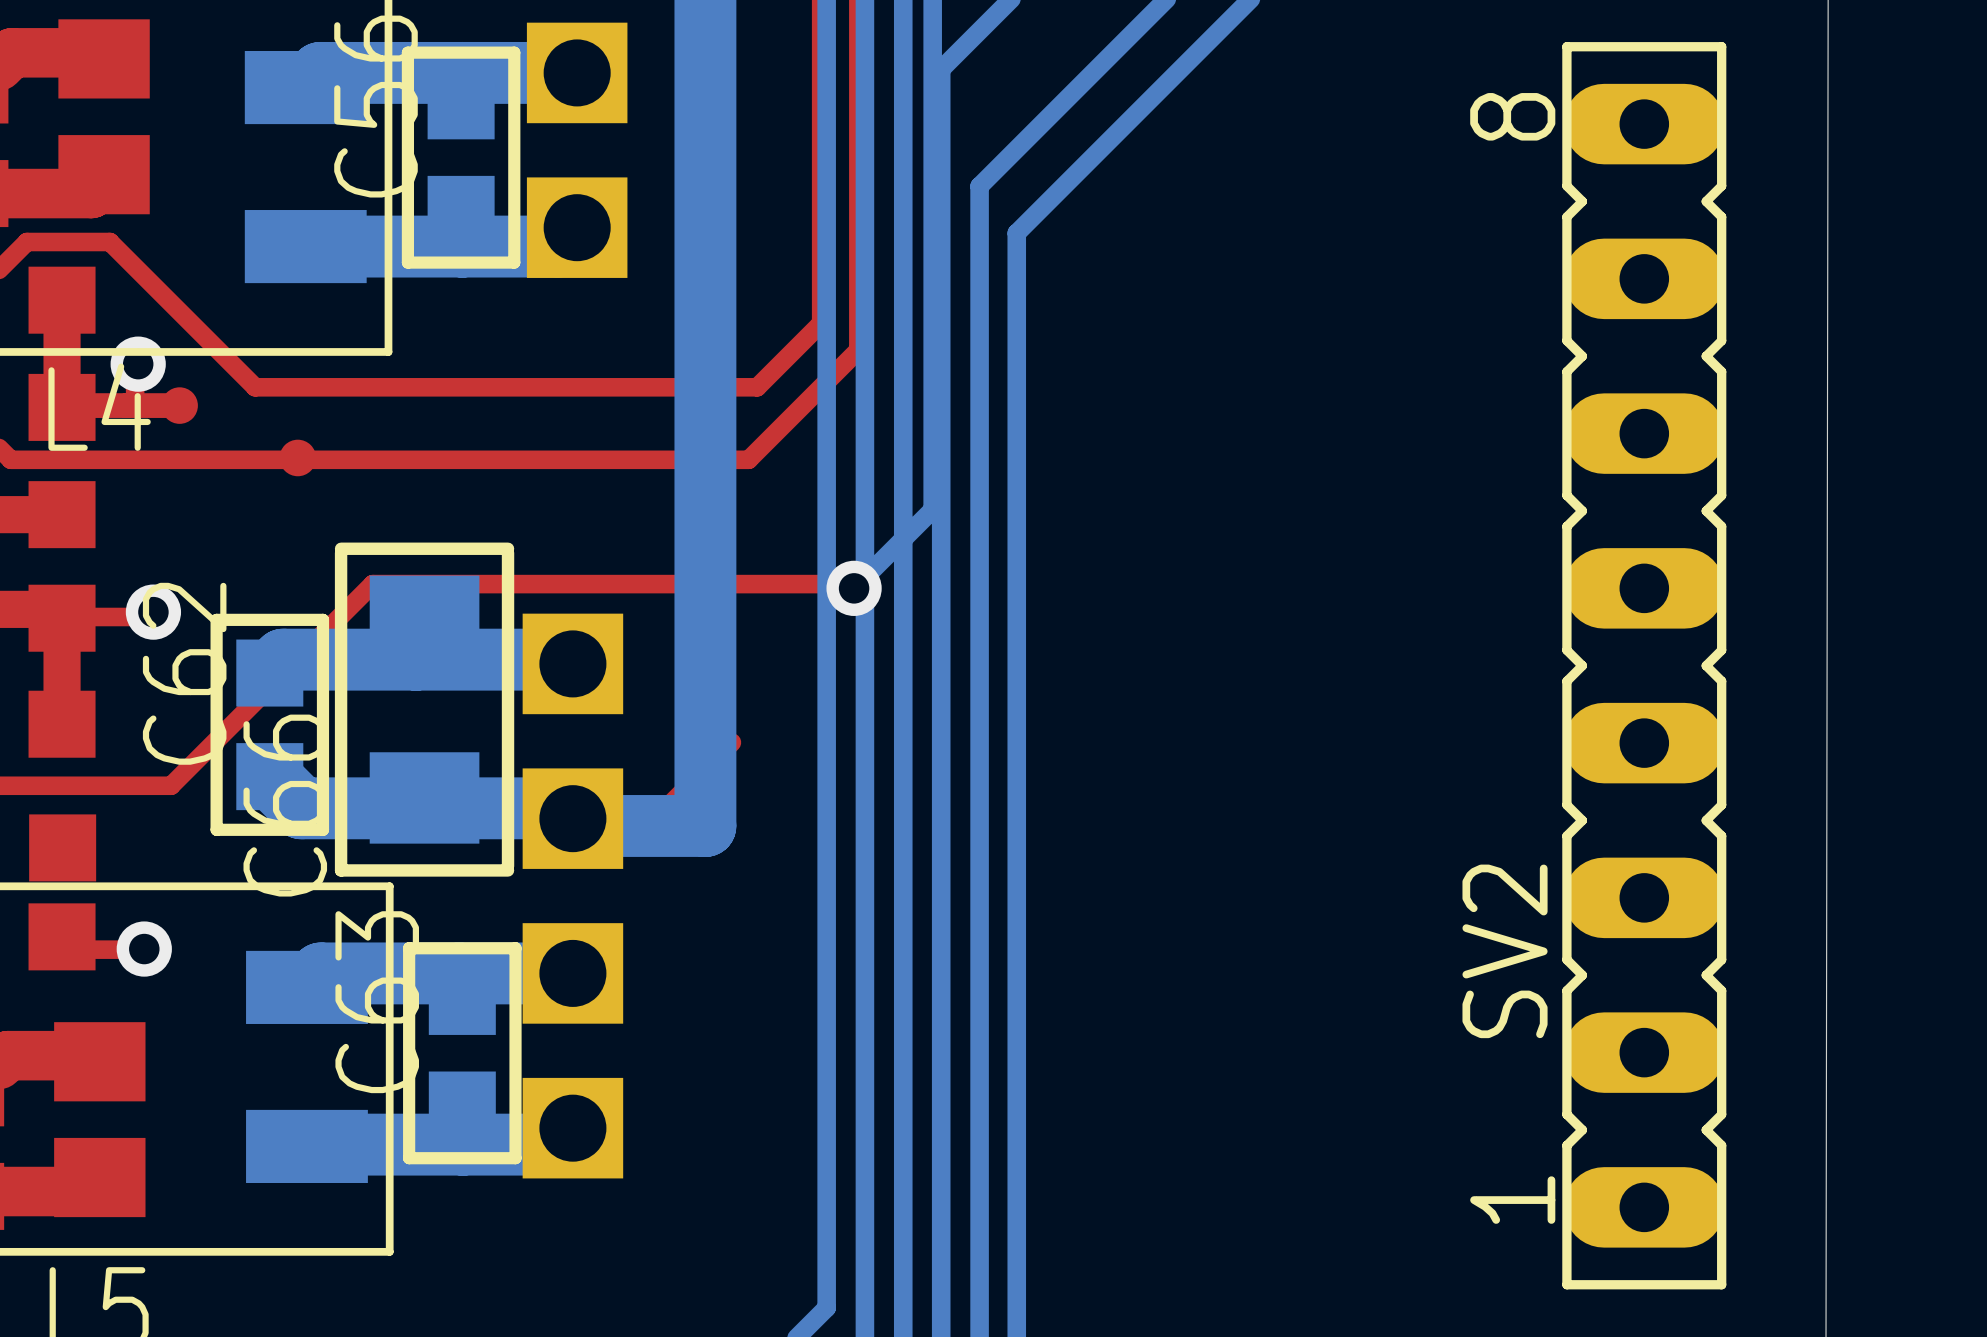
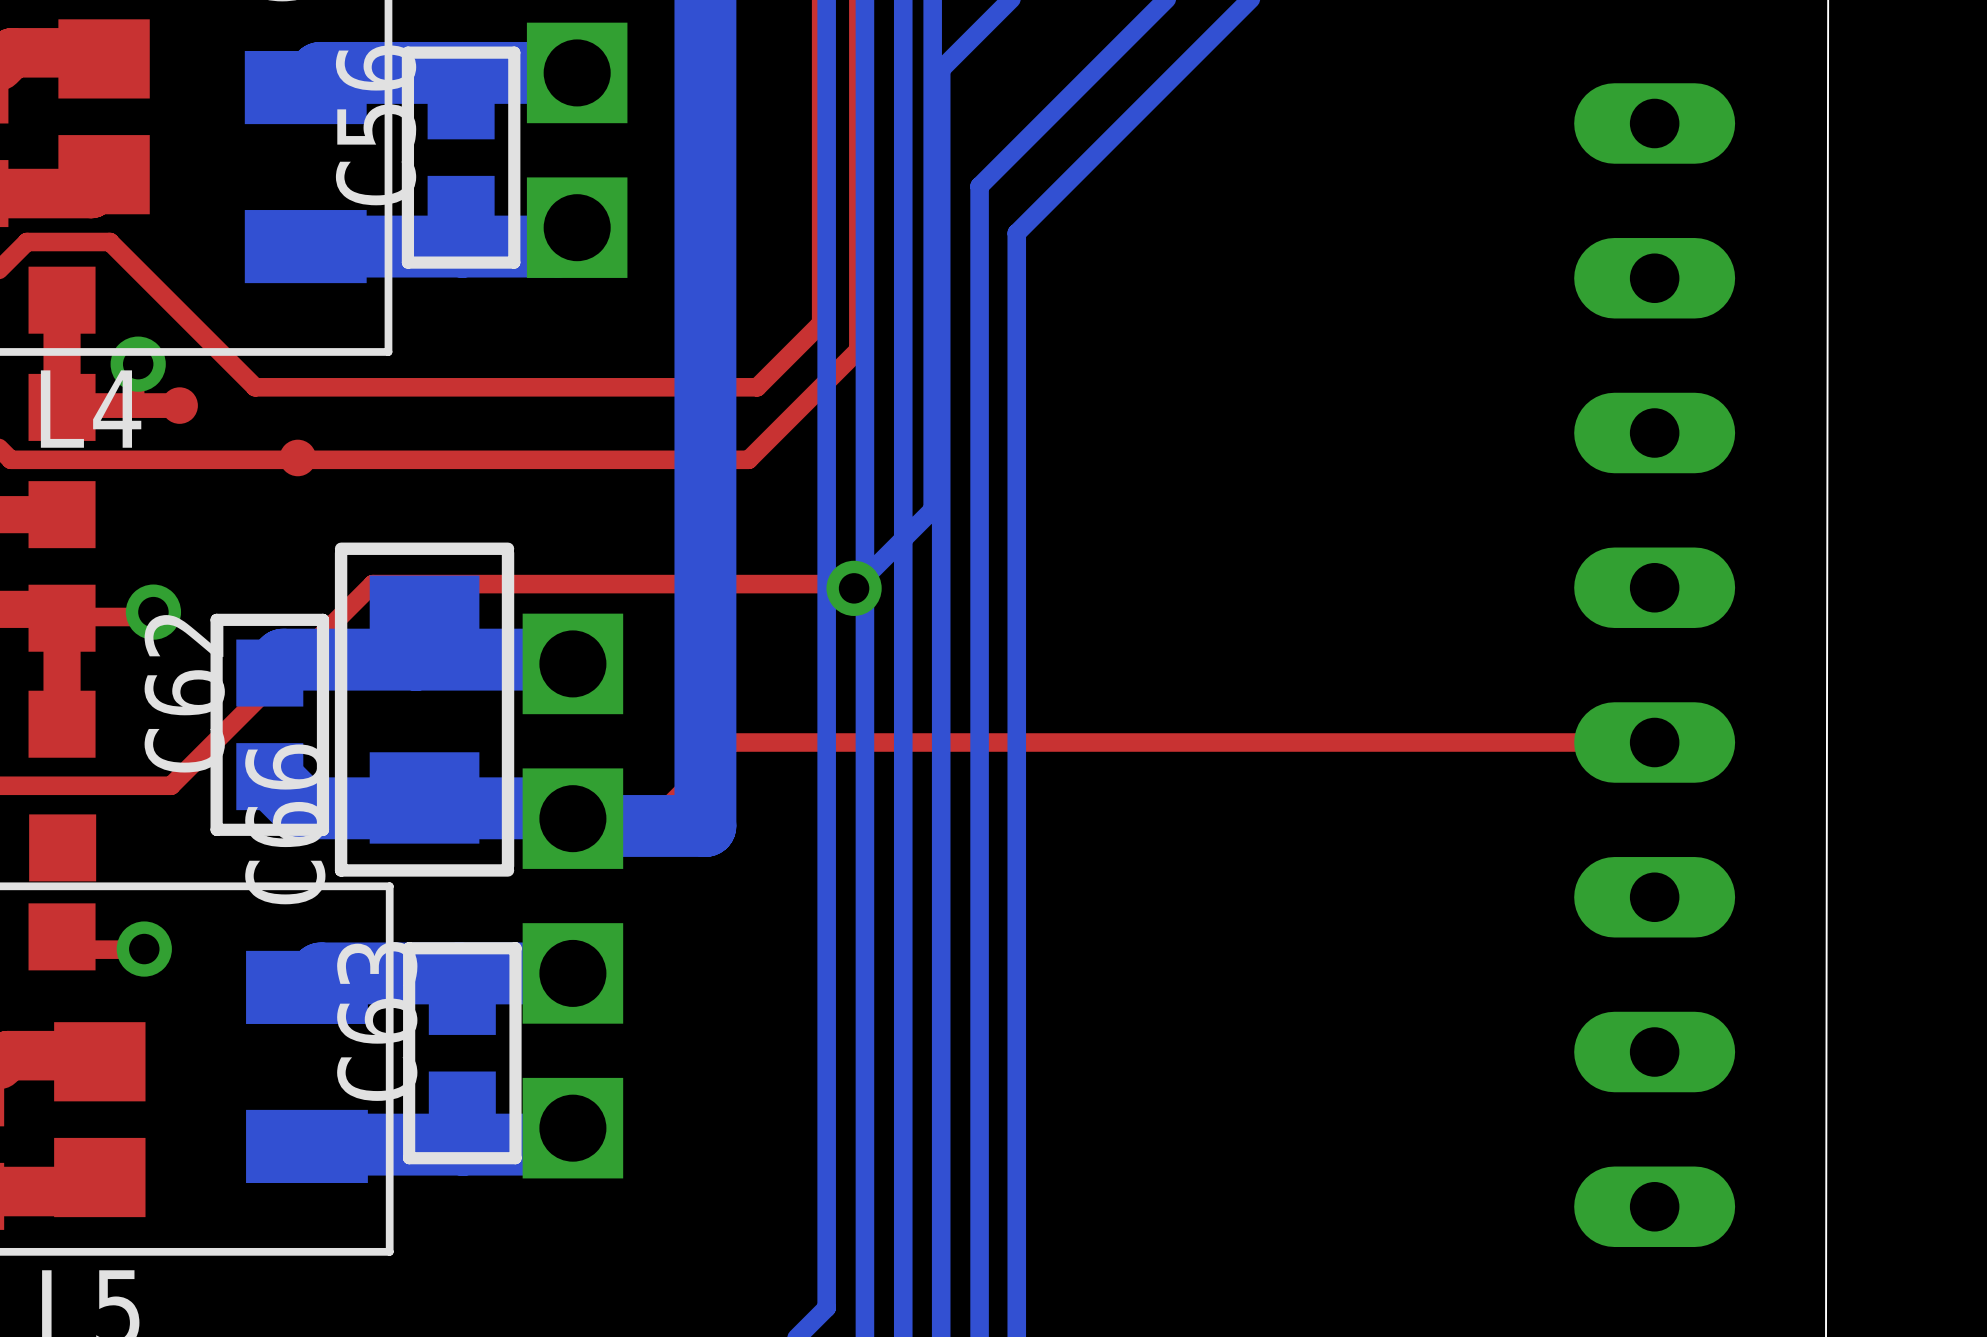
SV2 side: bottom (1644, 665) -> top (1654, 665)
top track: none -> (1654, 742) (731, 742)

